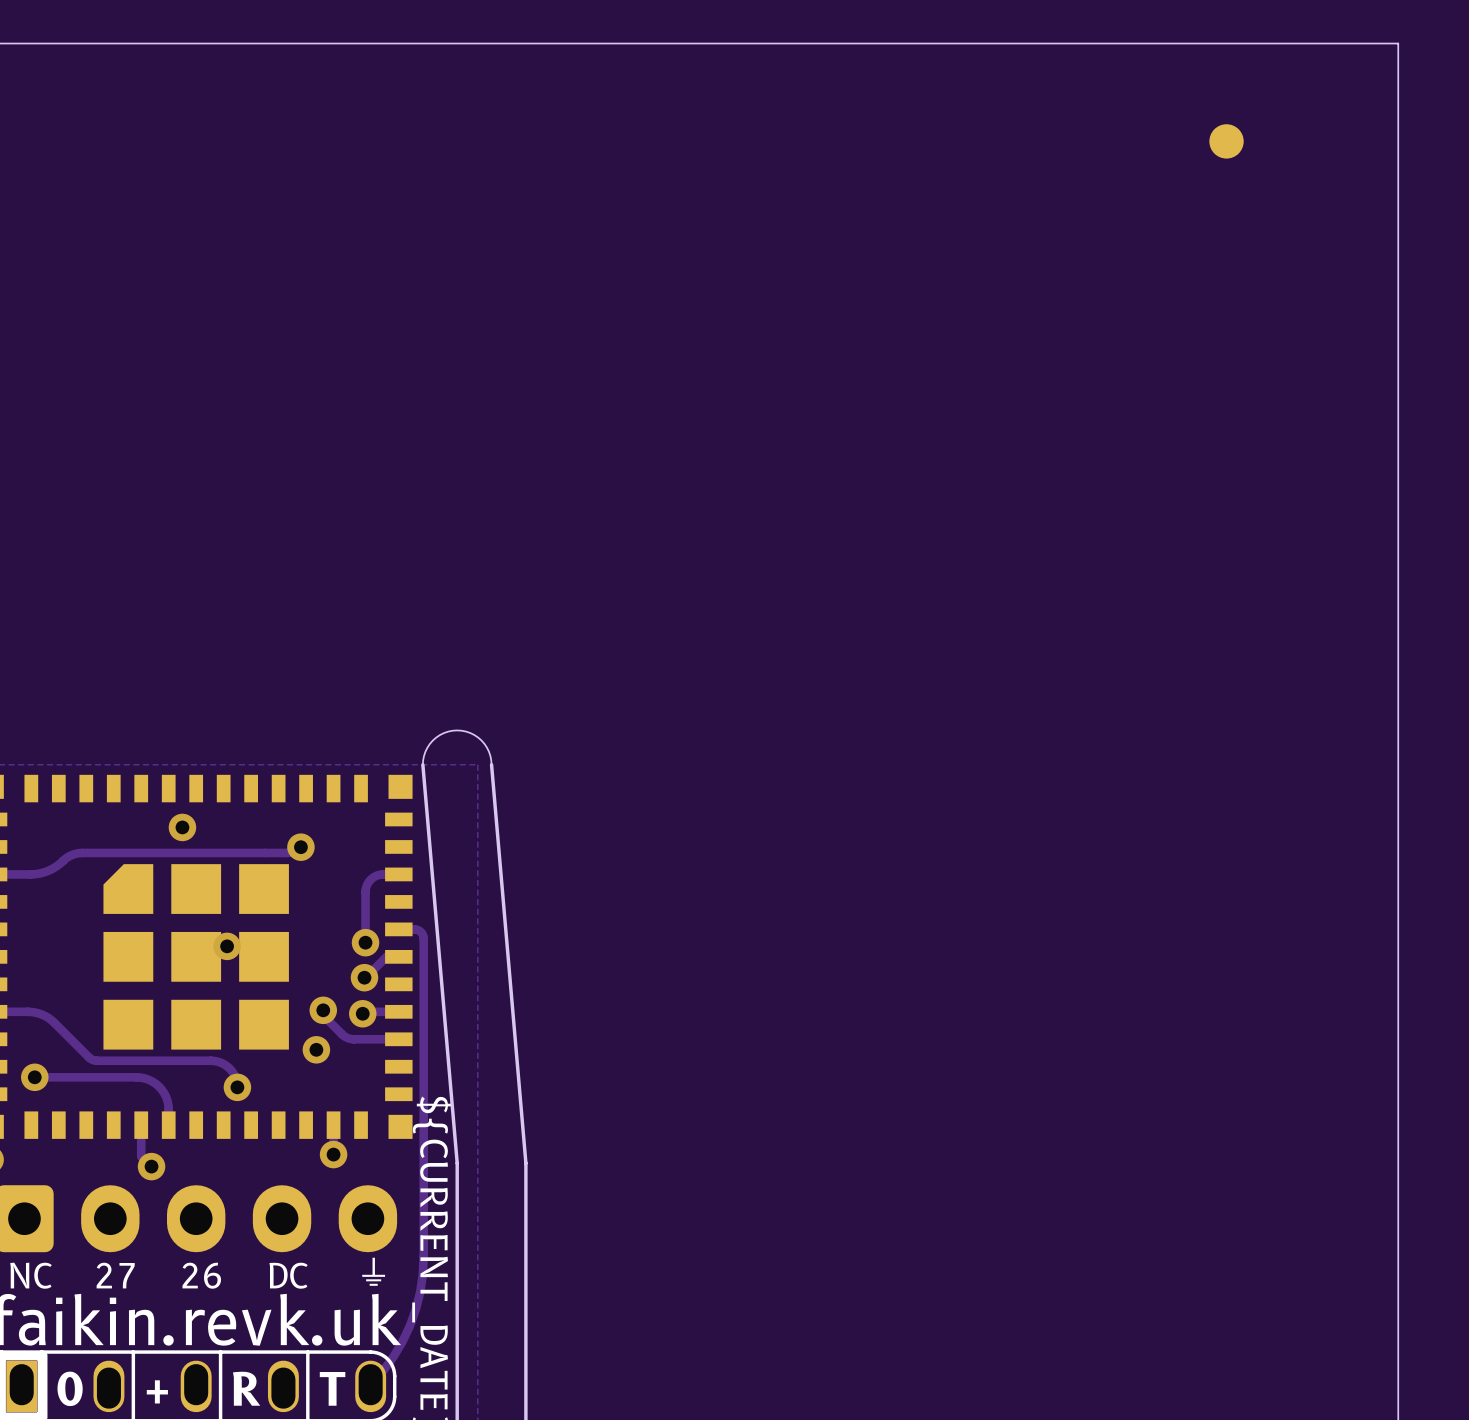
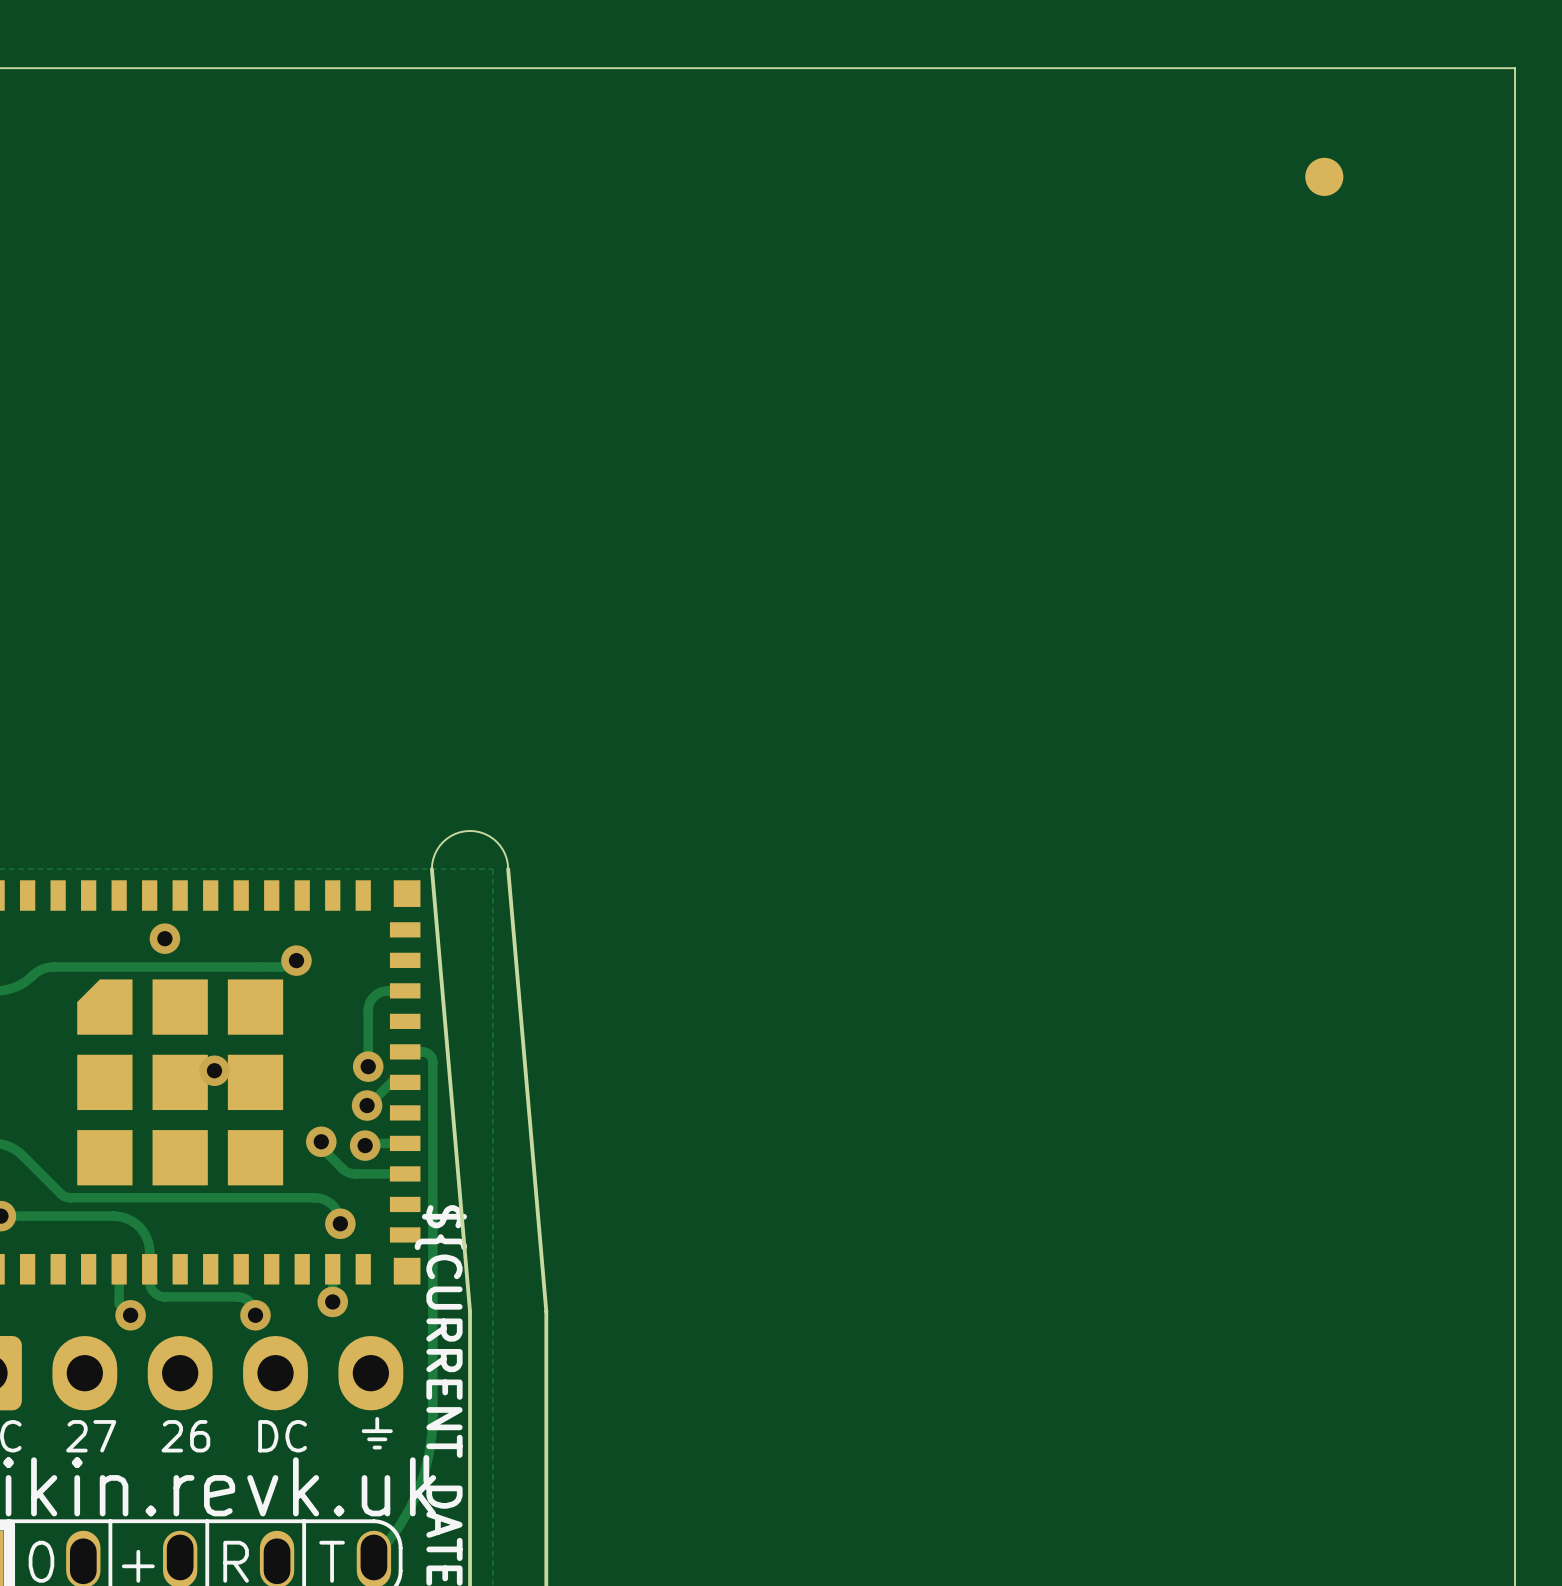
via position: (316, 1049) -> (340, 1223)
track: (210, 1060) (222, 1063) (229, 1068) (234, 1075) (237, 1087) -> (196, 1197) (317, 1197) (332, 1205) (338, 1213) (340, 1223)
via: (237, 1087) -> none
track: none -> (149, 1269) (150, 1286) (158, 1295) (241, 1297) (251, 1303) (255, 1315)
via: none -> (255, 1315)

